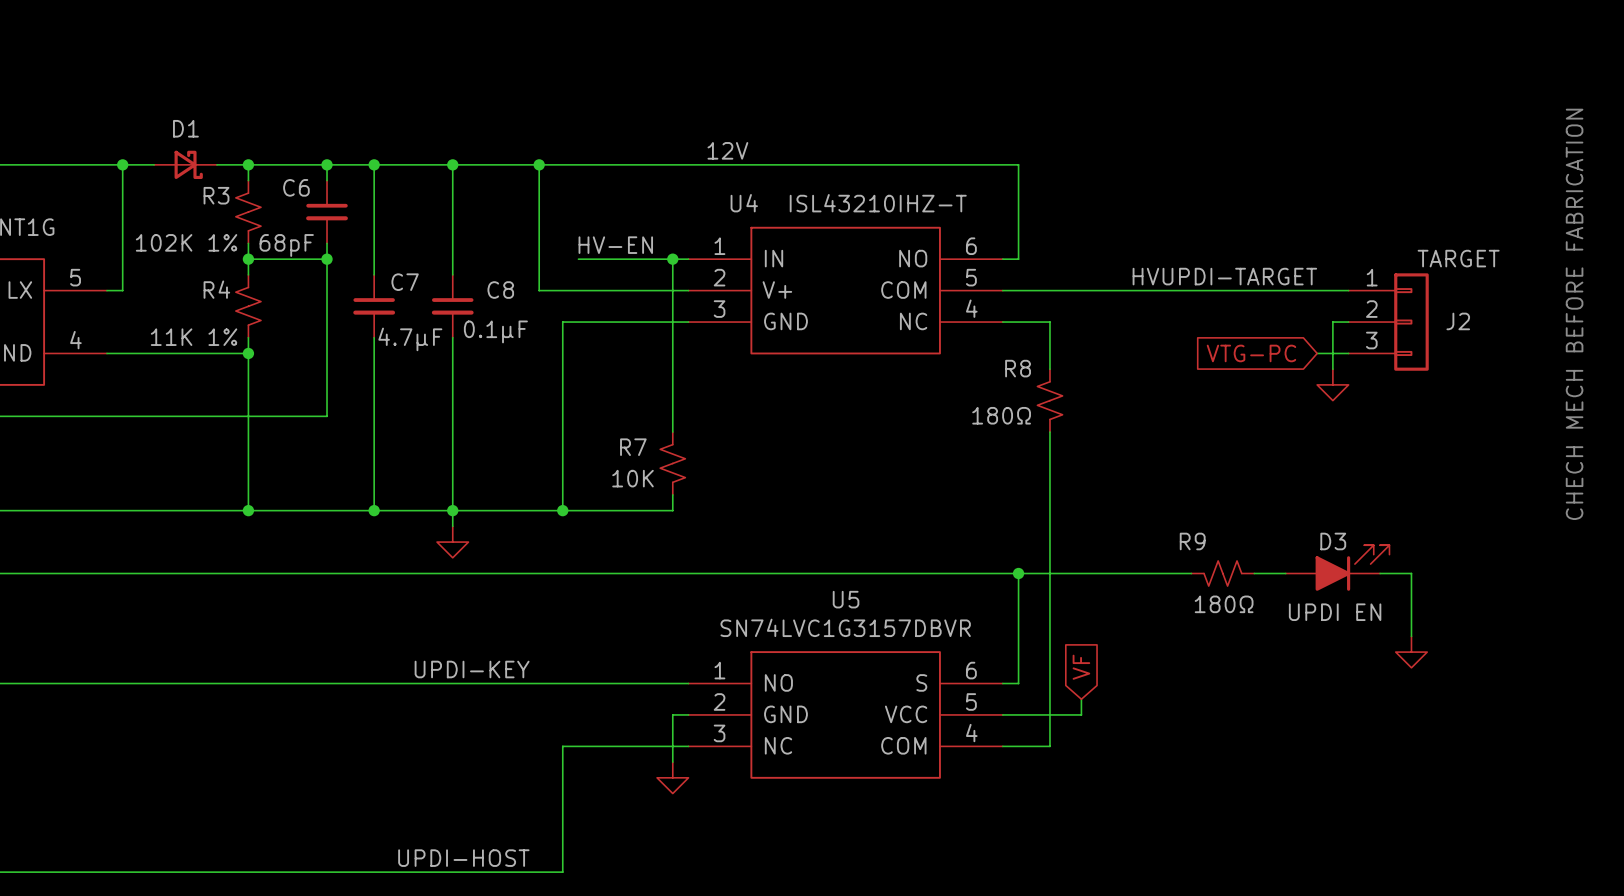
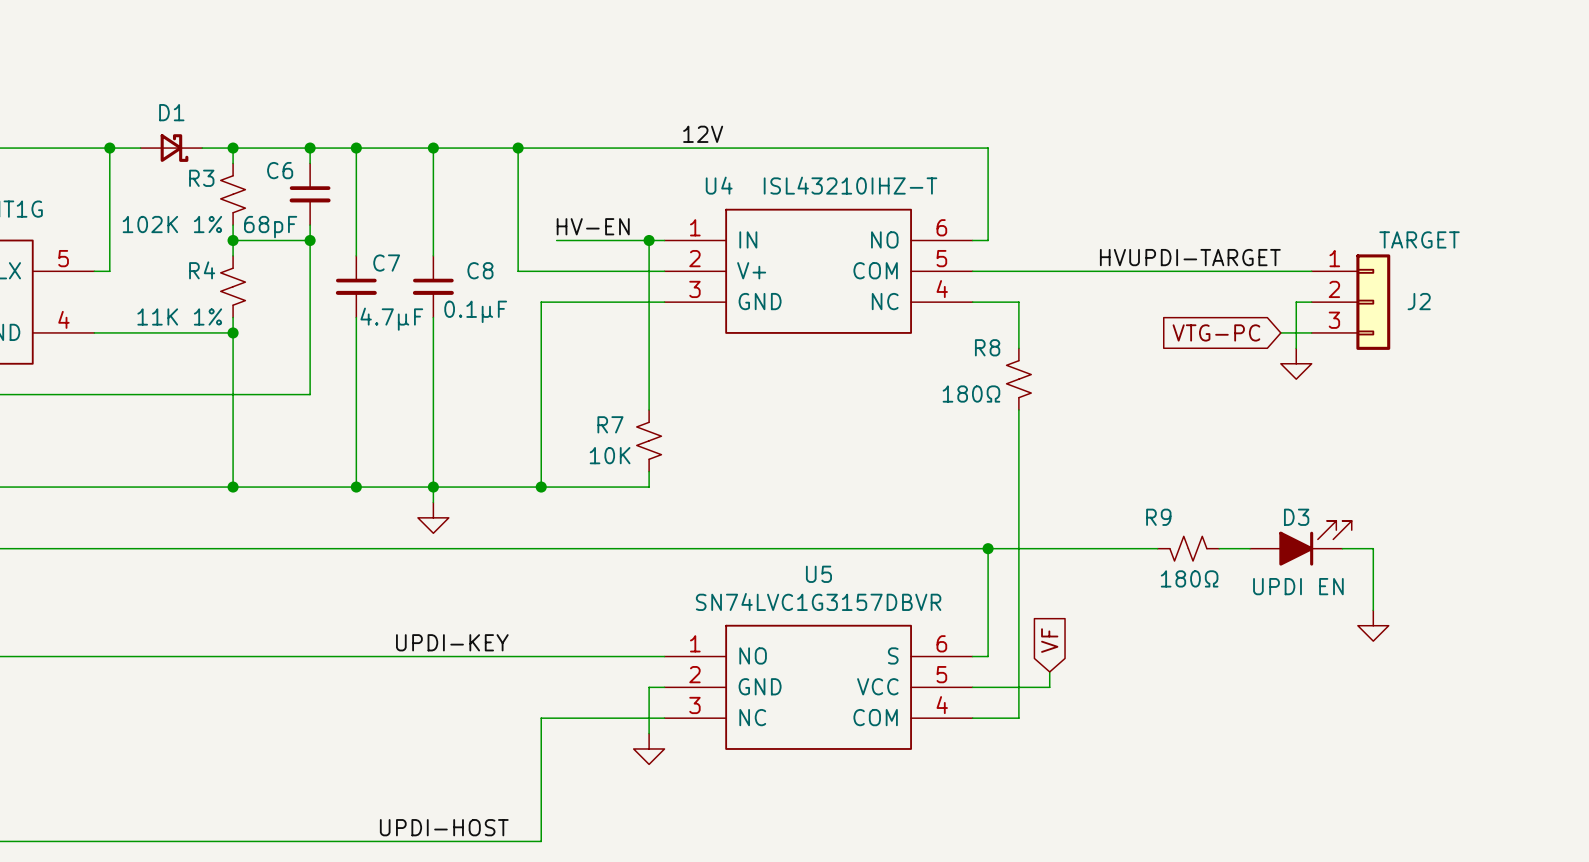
text: CHECH MECH BEFORE FABRICATION (1574, 314) -> none

